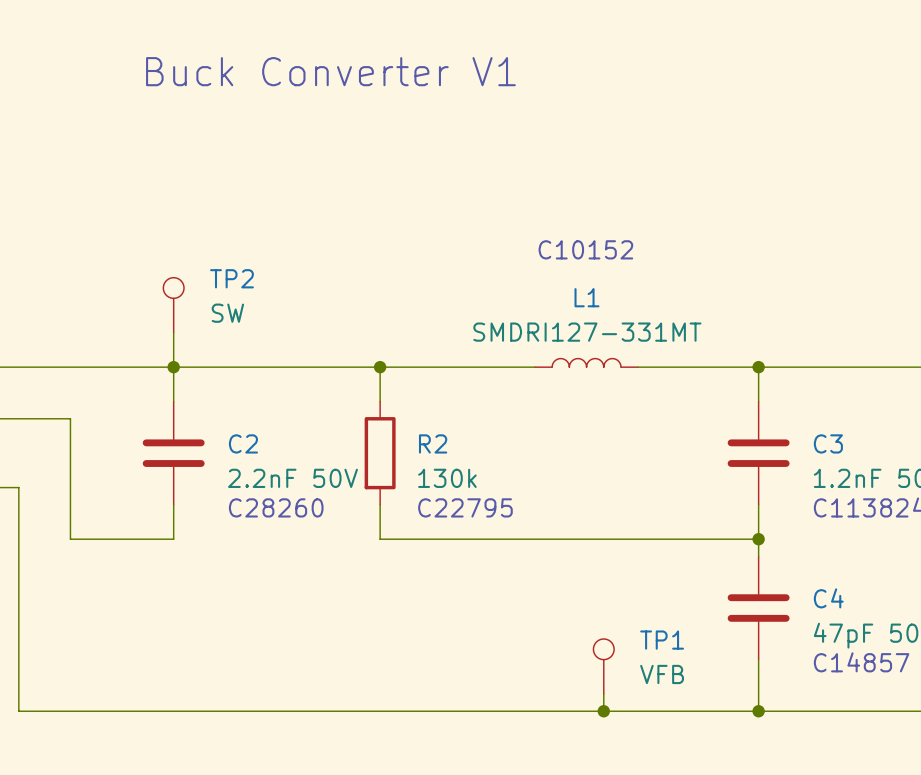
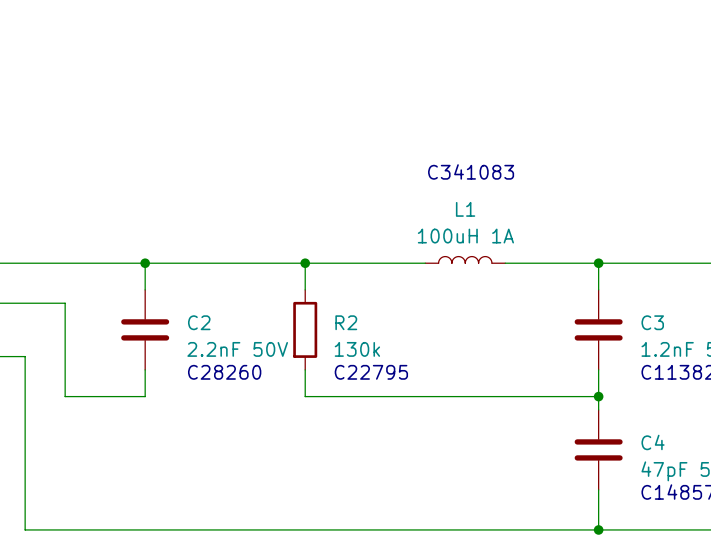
text: Buck Converter V1 (330, 71) -> none
text: C10152 (585, 249) -> C341083 (471, 171)
TP2: SW (173, 305) -> none
wire: (173, 332) (173, 367) -> none
L1 value: SMDRI127-331MT (587, 332) -> 100uH 1A (465, 236)
TP1: VFB (603, 666) -> none
wire: (603, 694) (603, 711) -> none
junction: (603, 711) -> none

